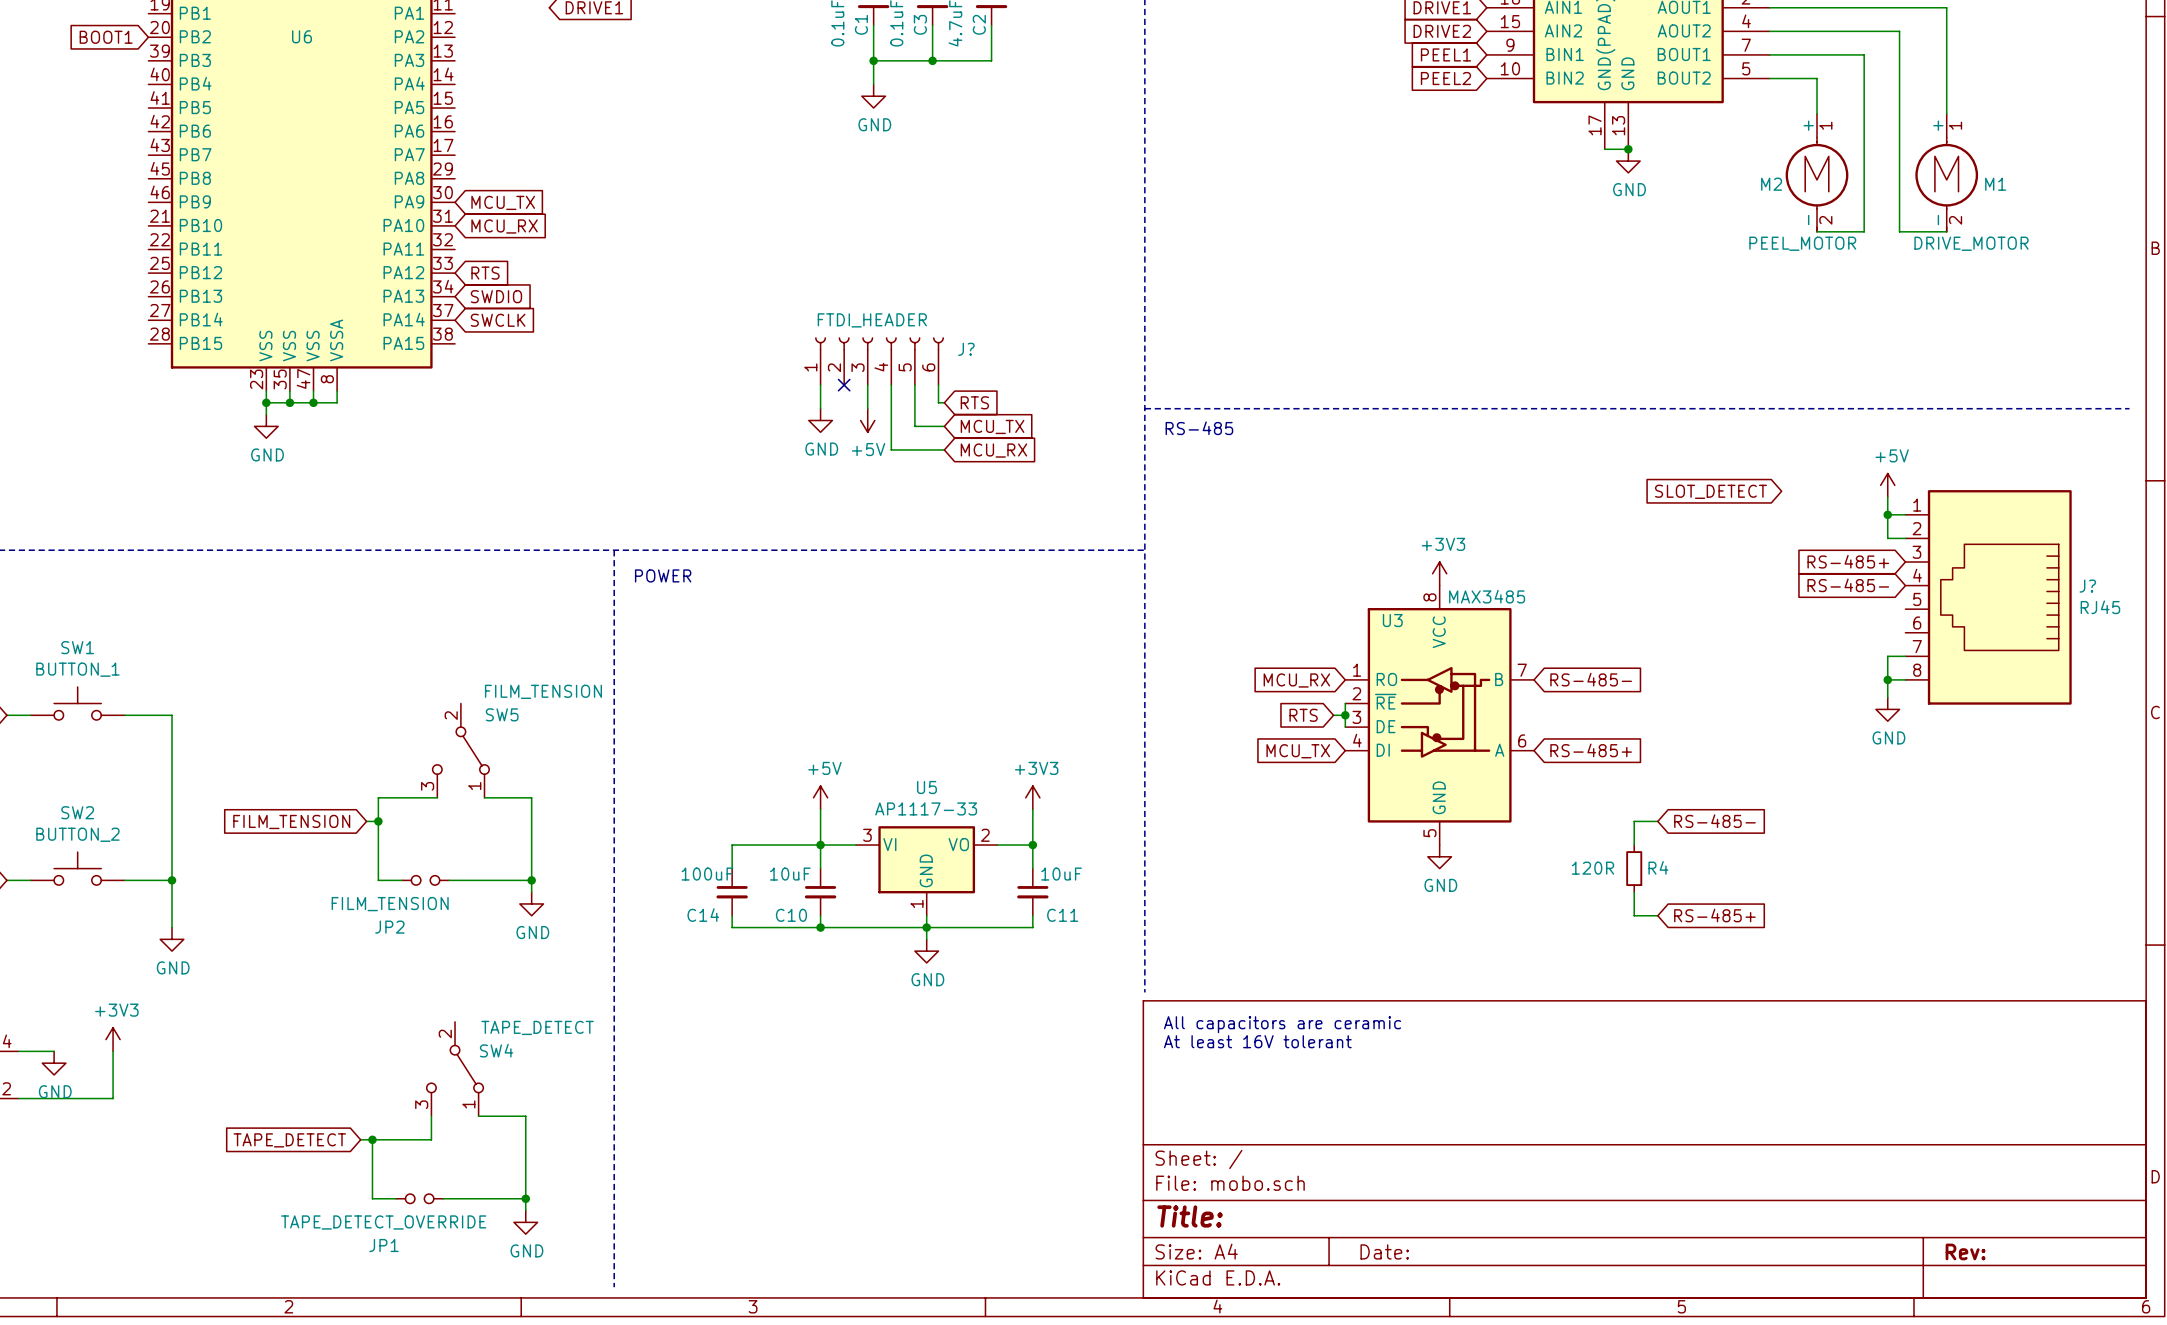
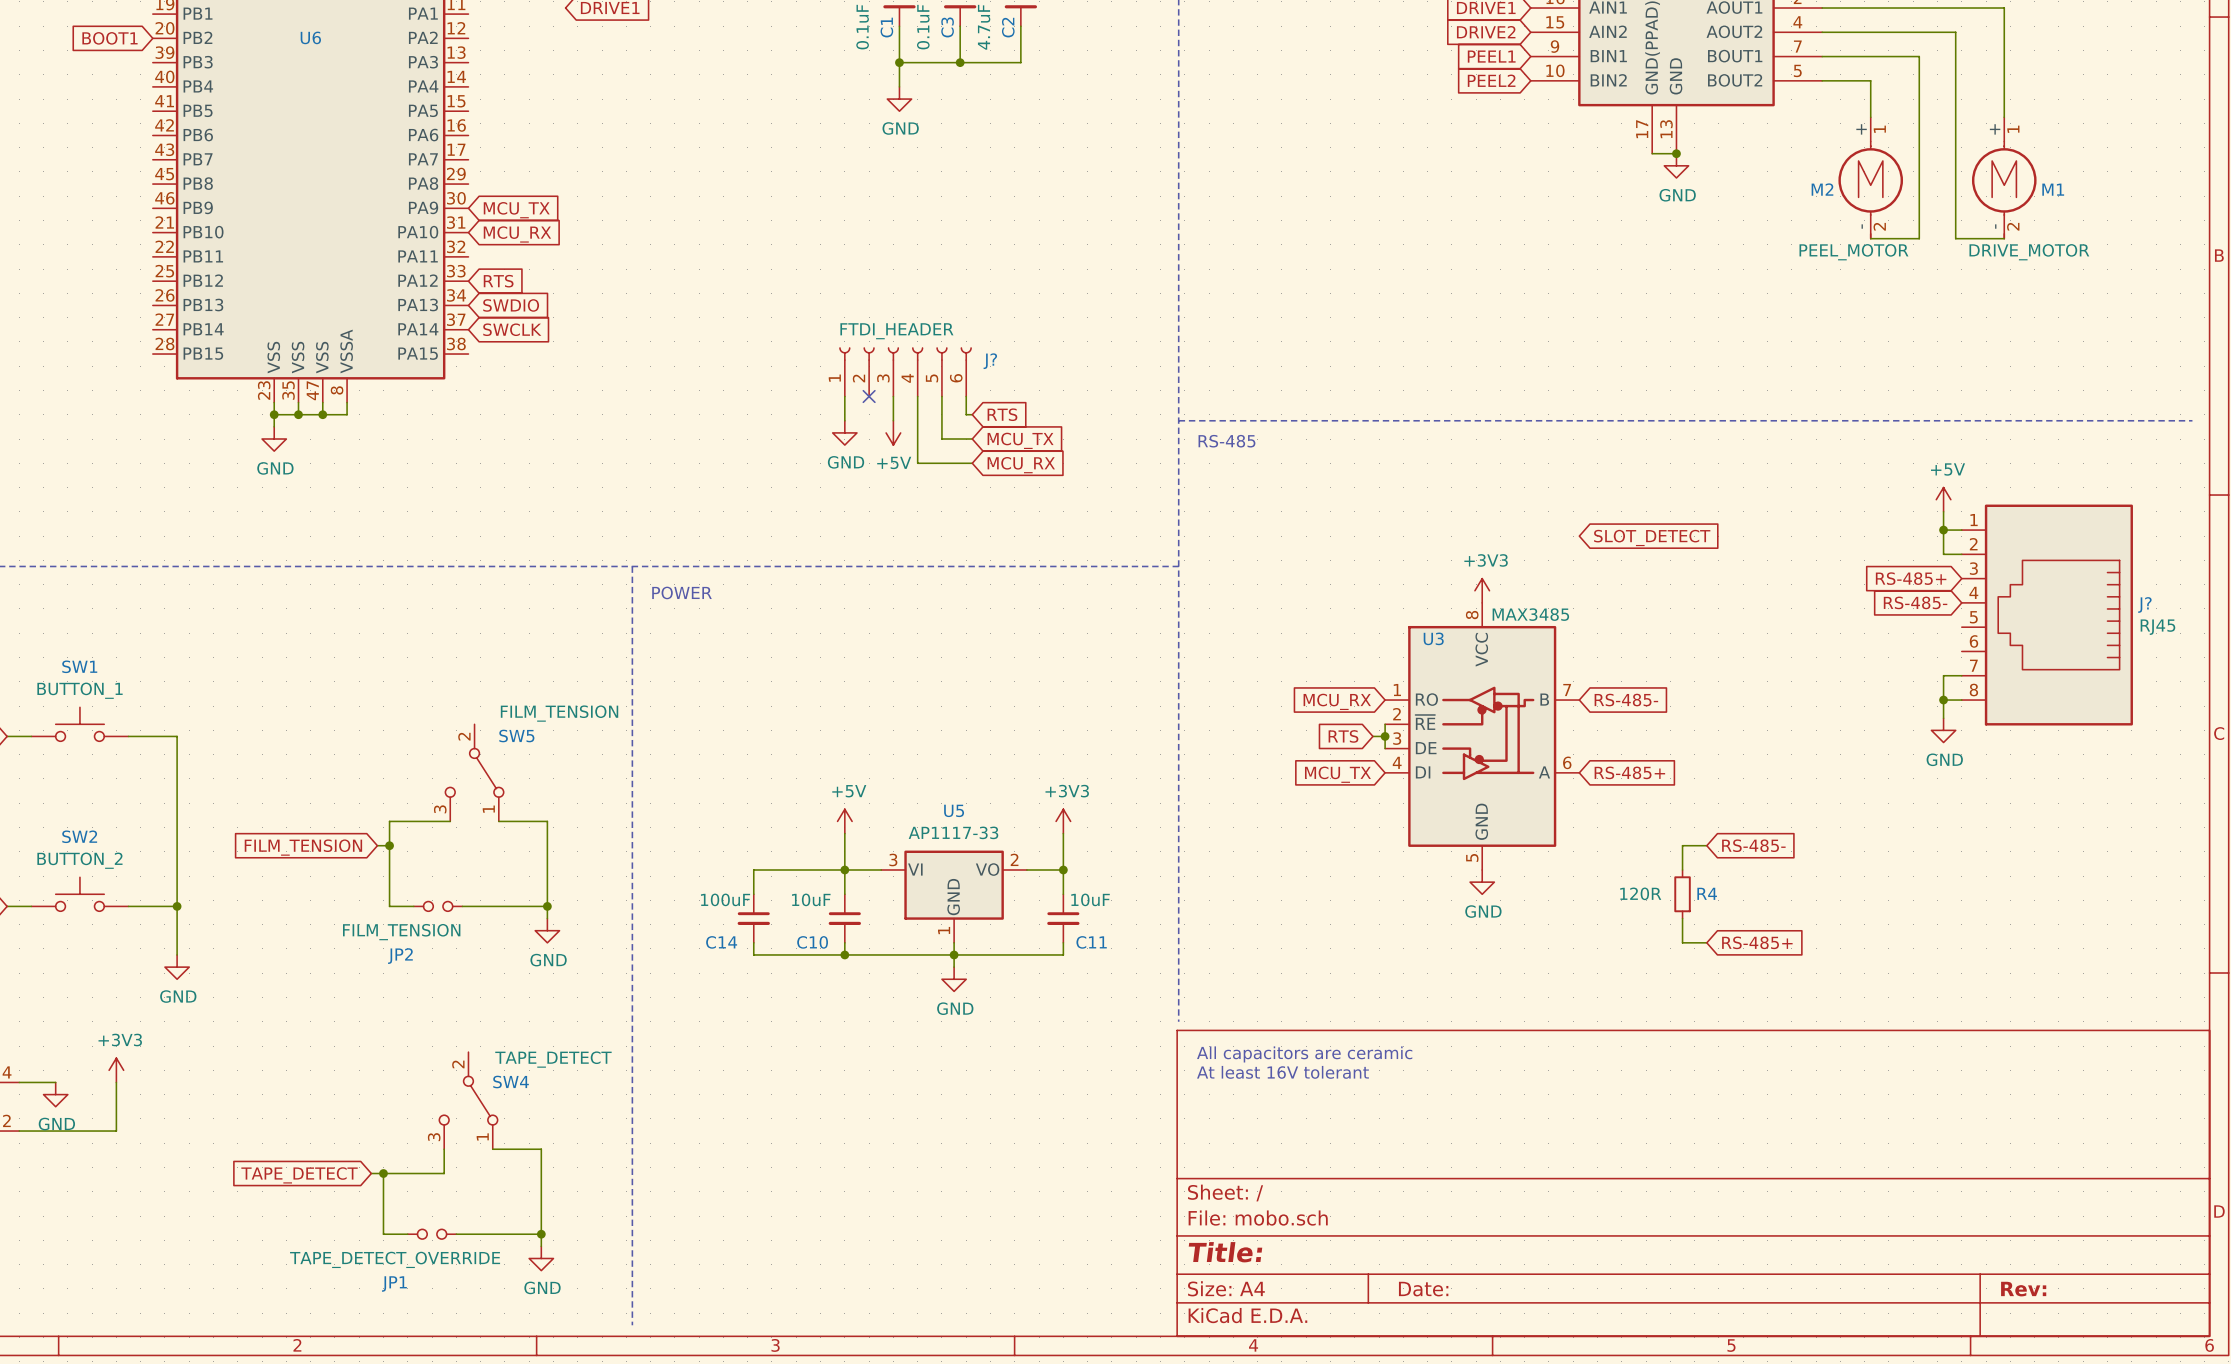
global label: SLOT_DETECT (1710, 491) -> none
global label: none -> SLOT_DETECT (1652, 537)

